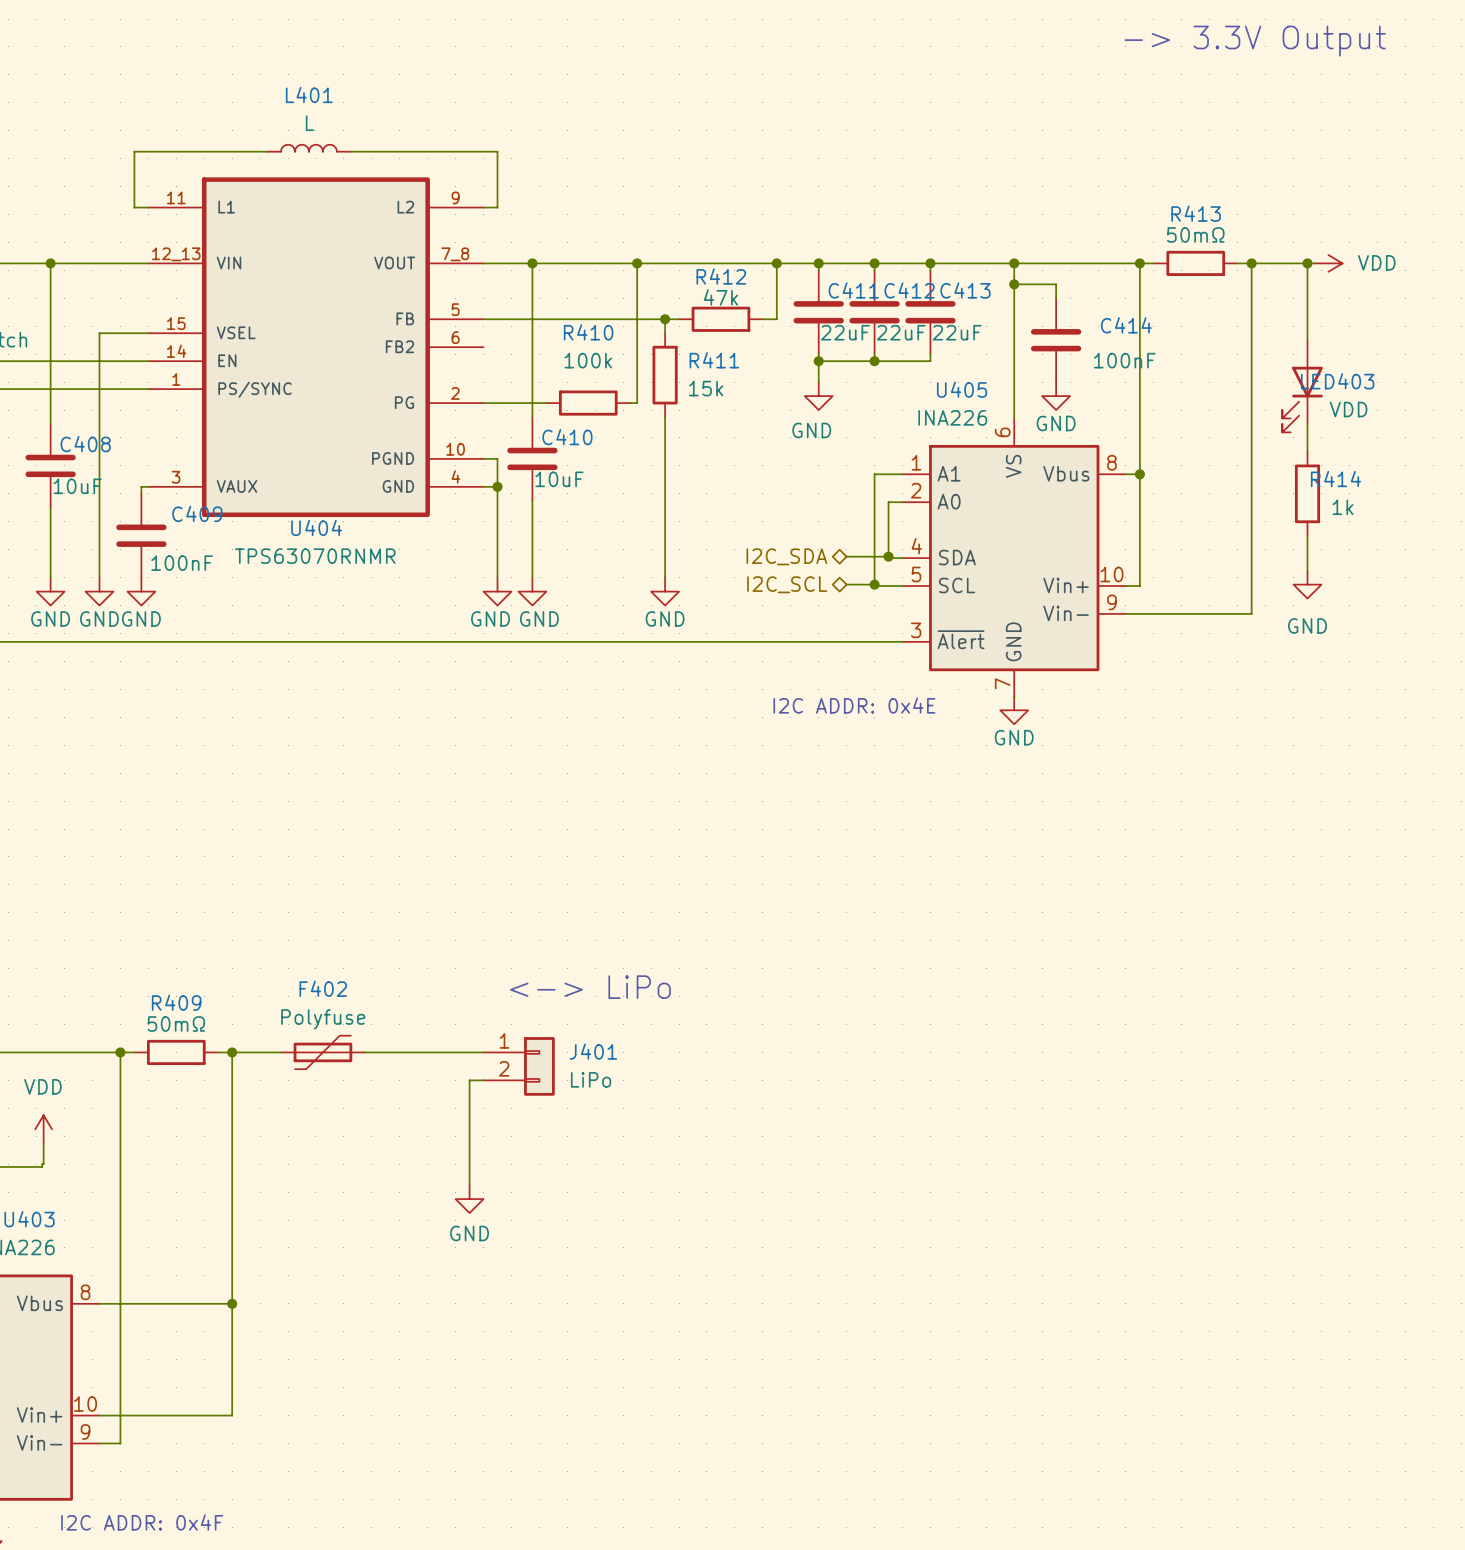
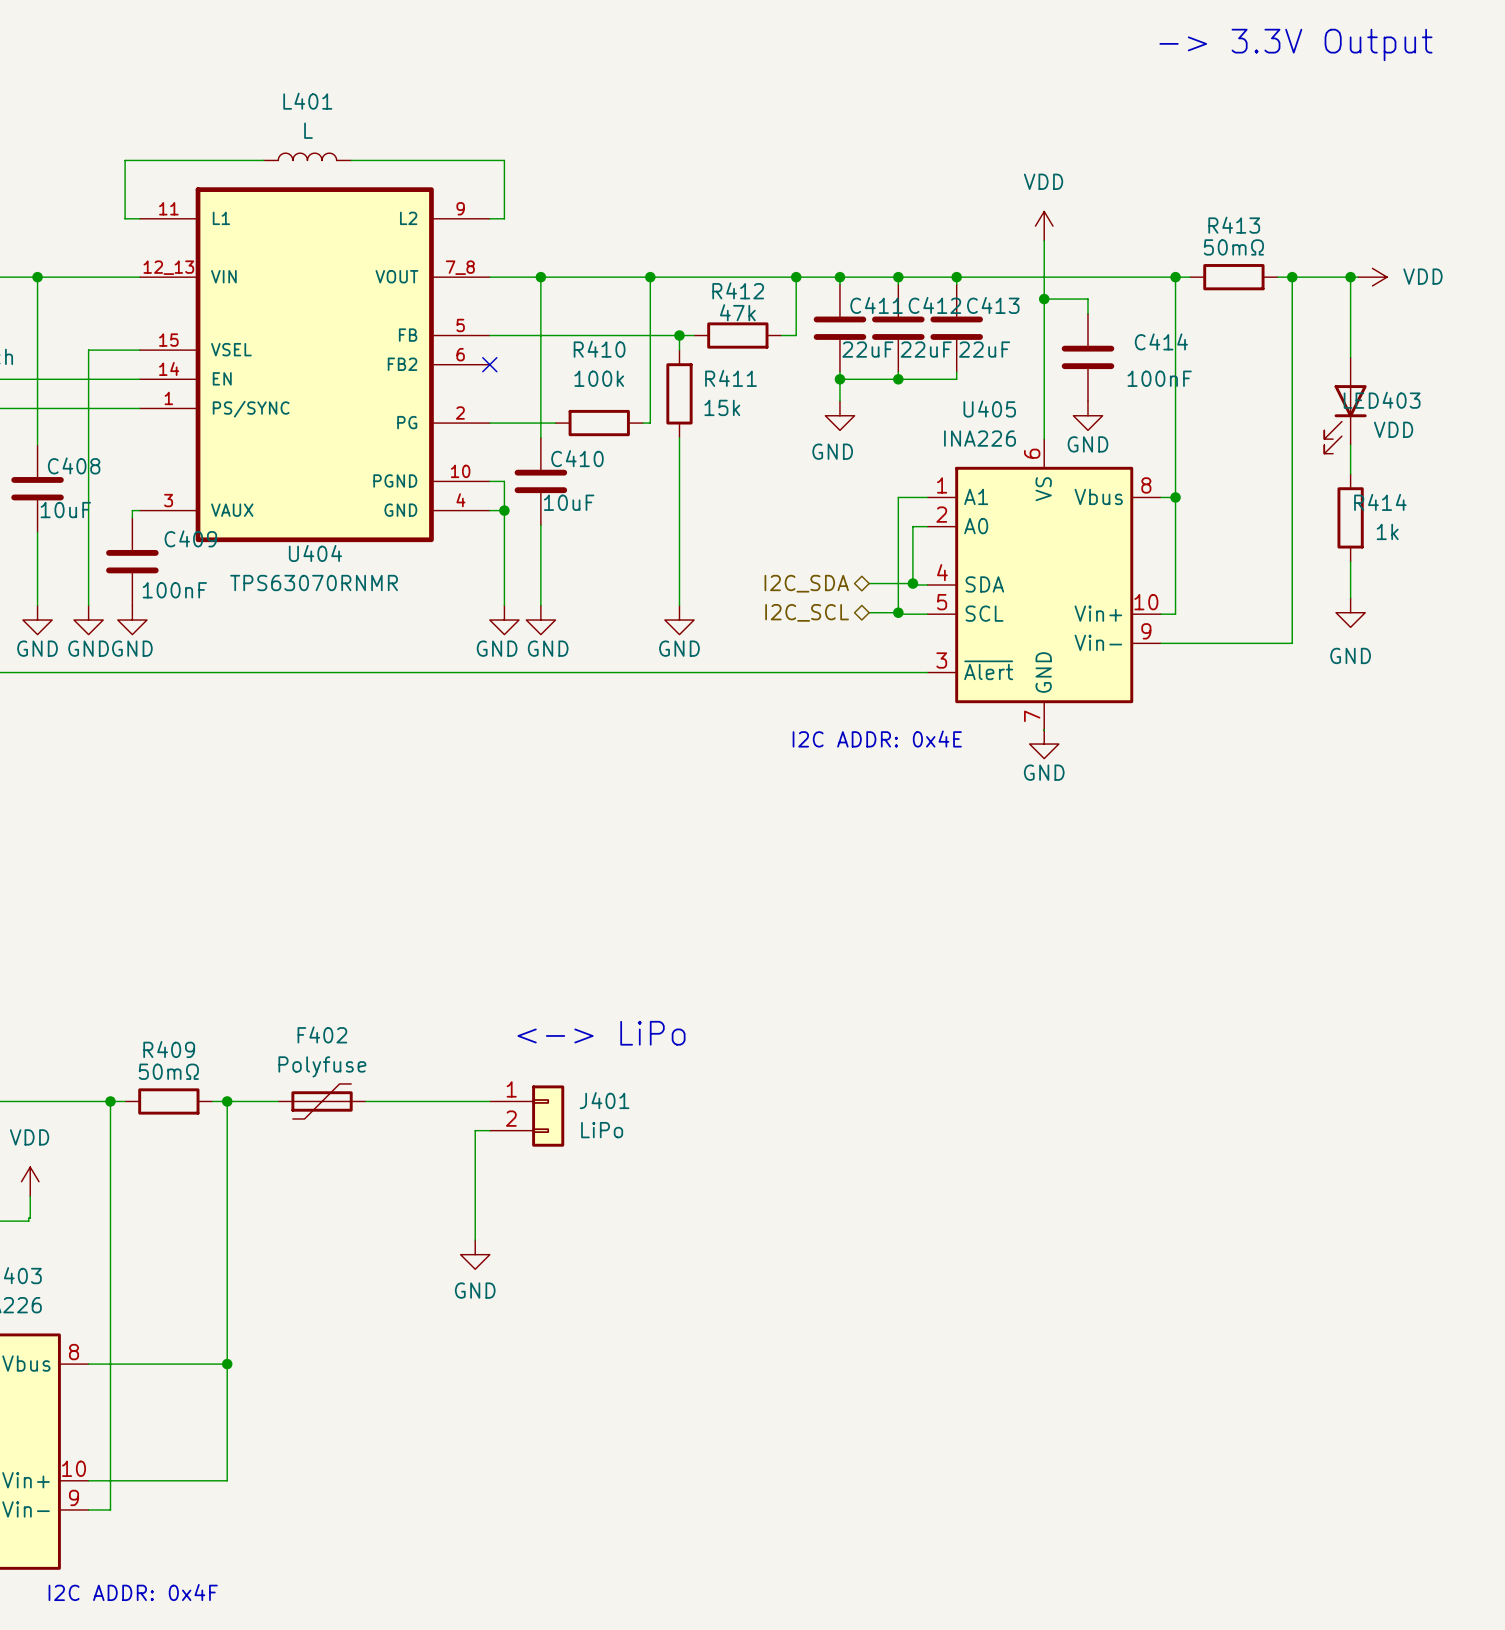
power symbol: none -> VDD (1044, 226)
wire: none -> (1044, 240) (1044, 277)
junction: (1014, 263) -> none
no-connect mark: none -> (489, 364)

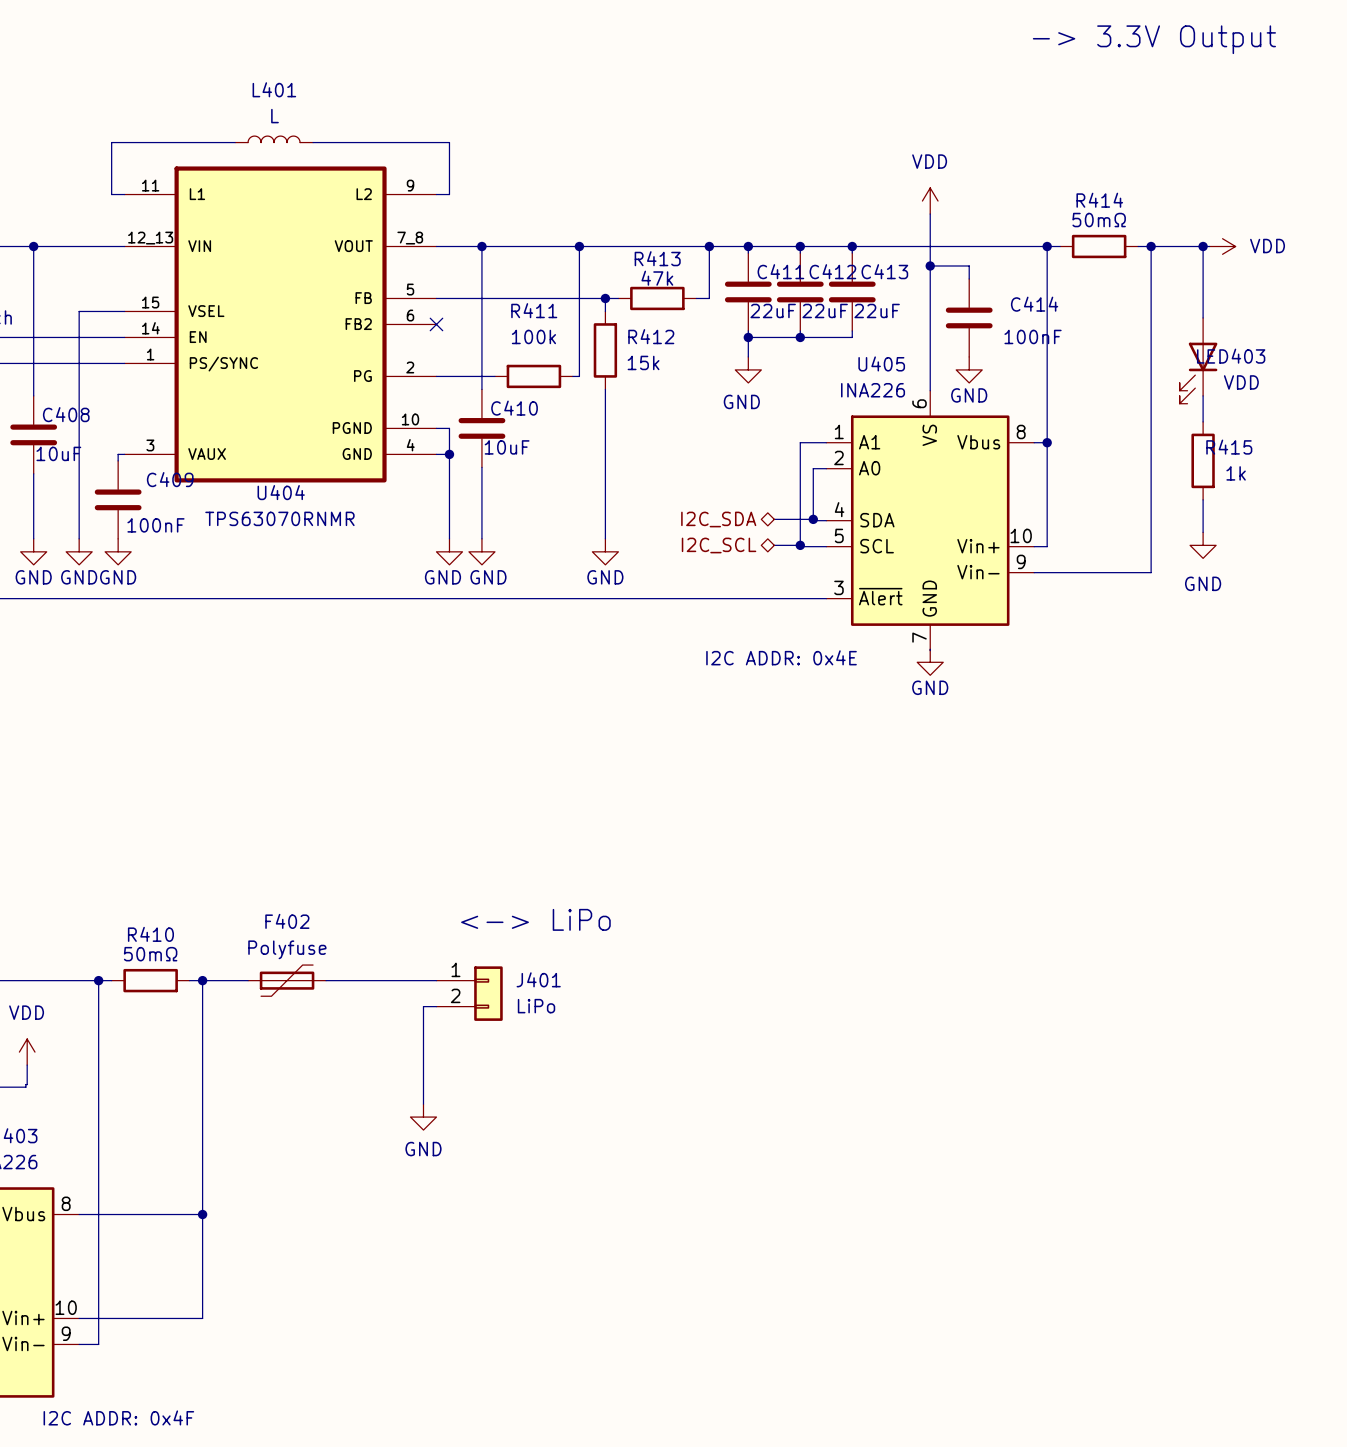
R413 name: R413 (1234, 225) -> R414 (1099, 200)
R412 name: R412 (738, 290) -> R413 (657, 258)
R410 name: R410 (599, 349) -> R411 (534, 310)
R411 name: R411 (731, 378) -> R412 (651, 336)
R414 name: R414 (1380, 502) -> R415 (1229, 447)
R409 name: R409 (169, 1049) -> R410 (150, 934)

